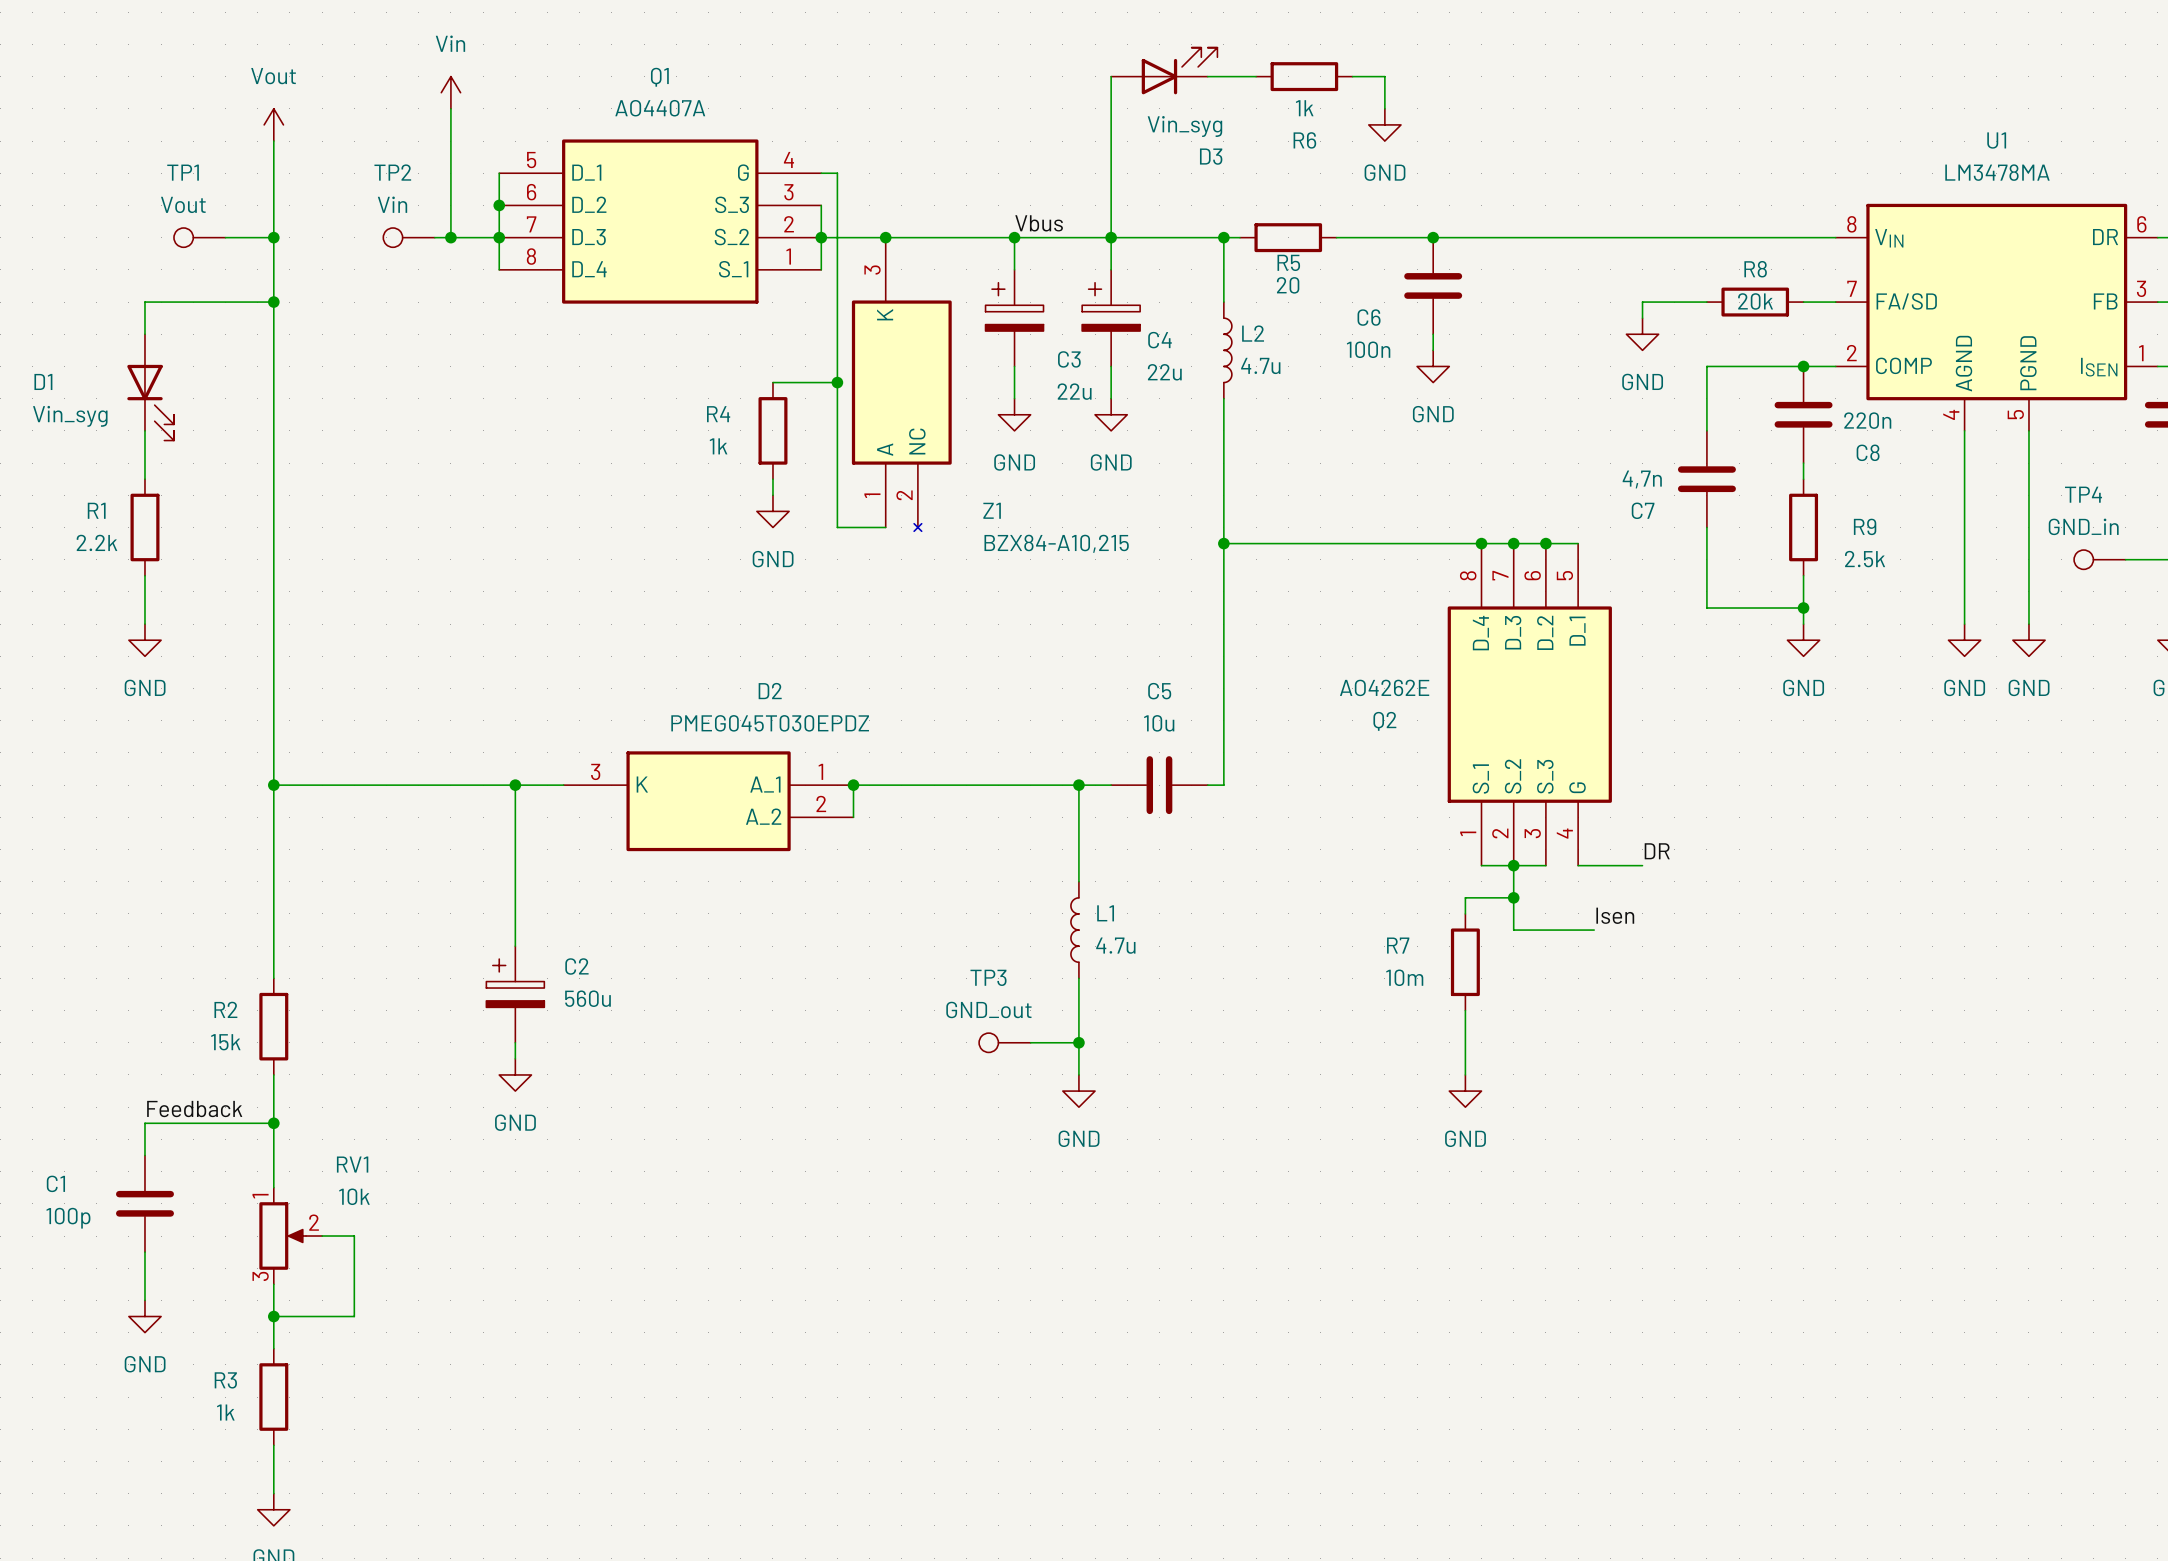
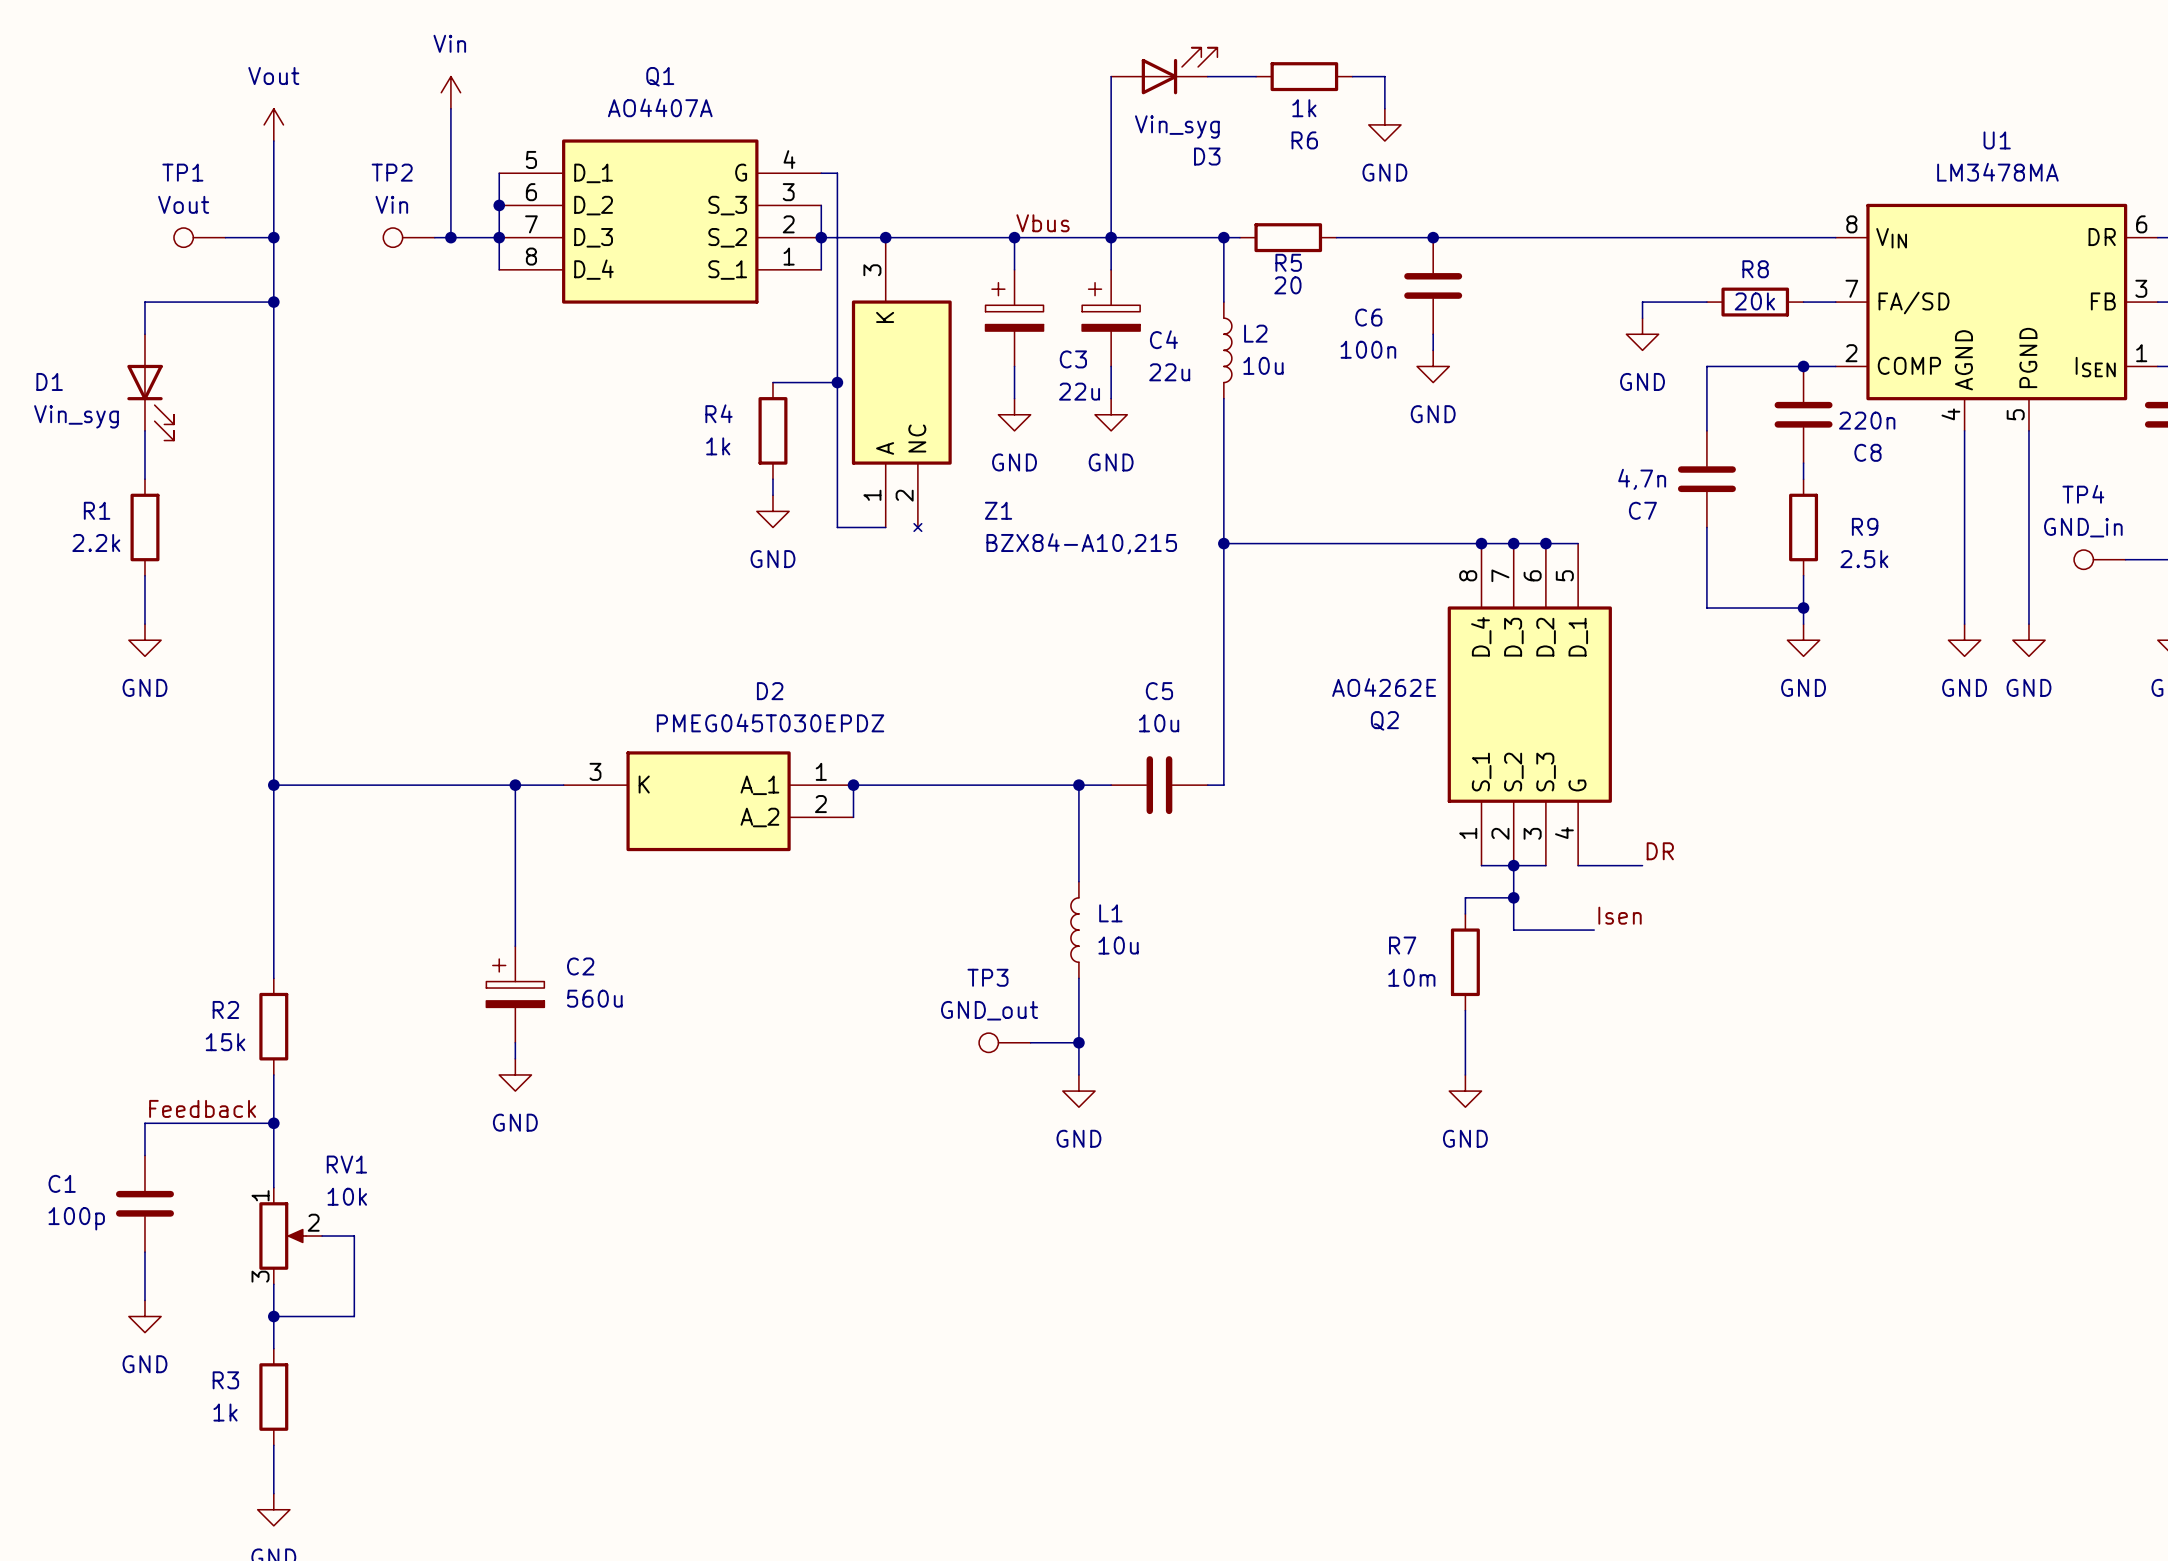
L2 value: 4.7u (1260, 365) -> 10u (1263, 365)
L1 value: 4.7u (1115, 945) -> 10u (1118, 945)

